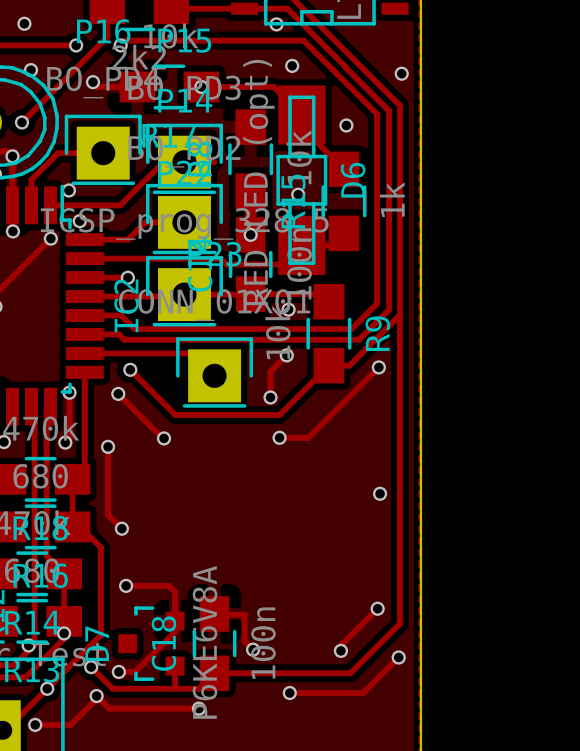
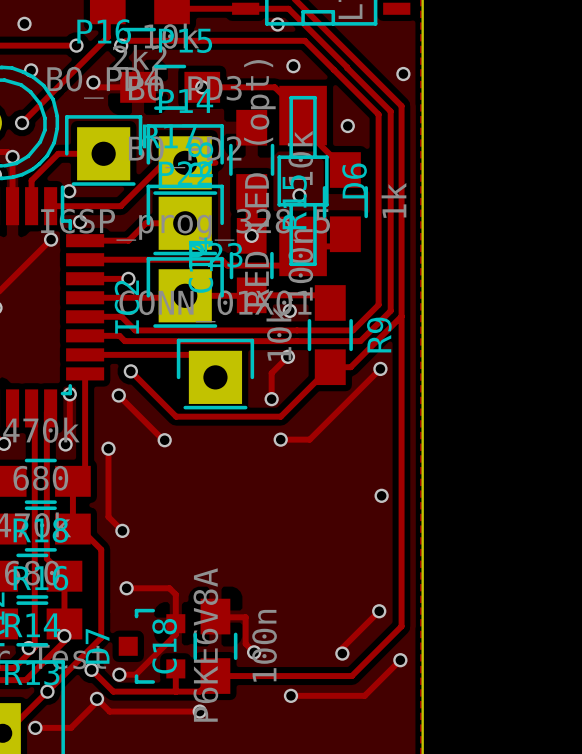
via: (12, 231) -> none

